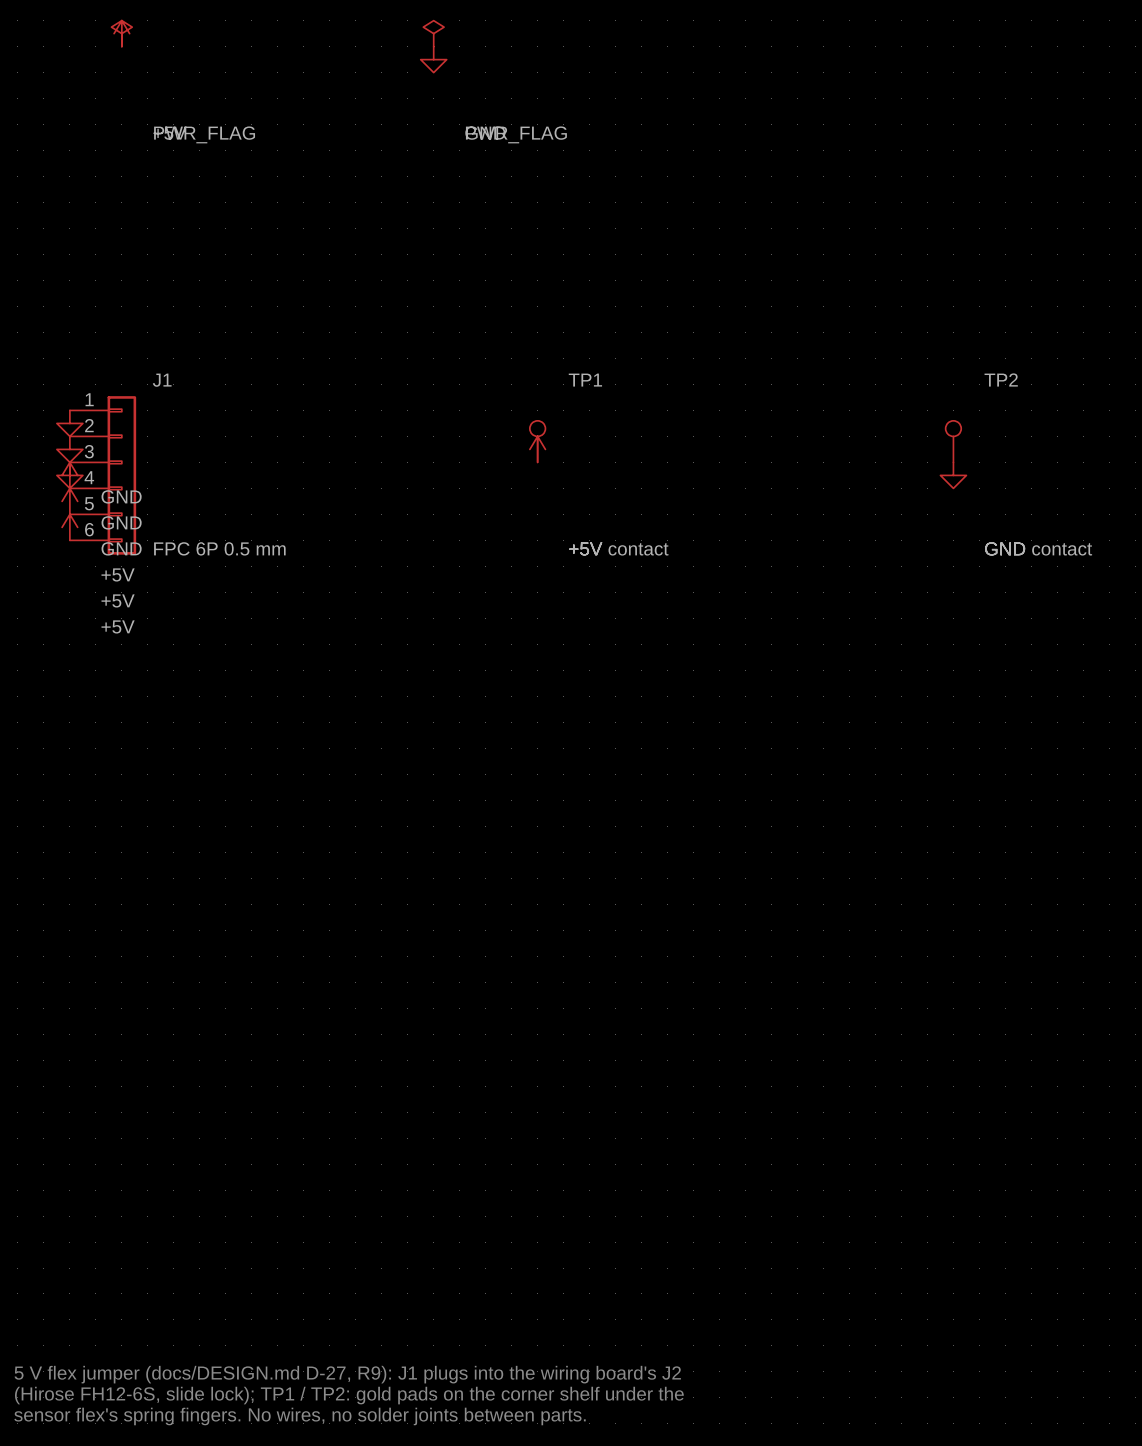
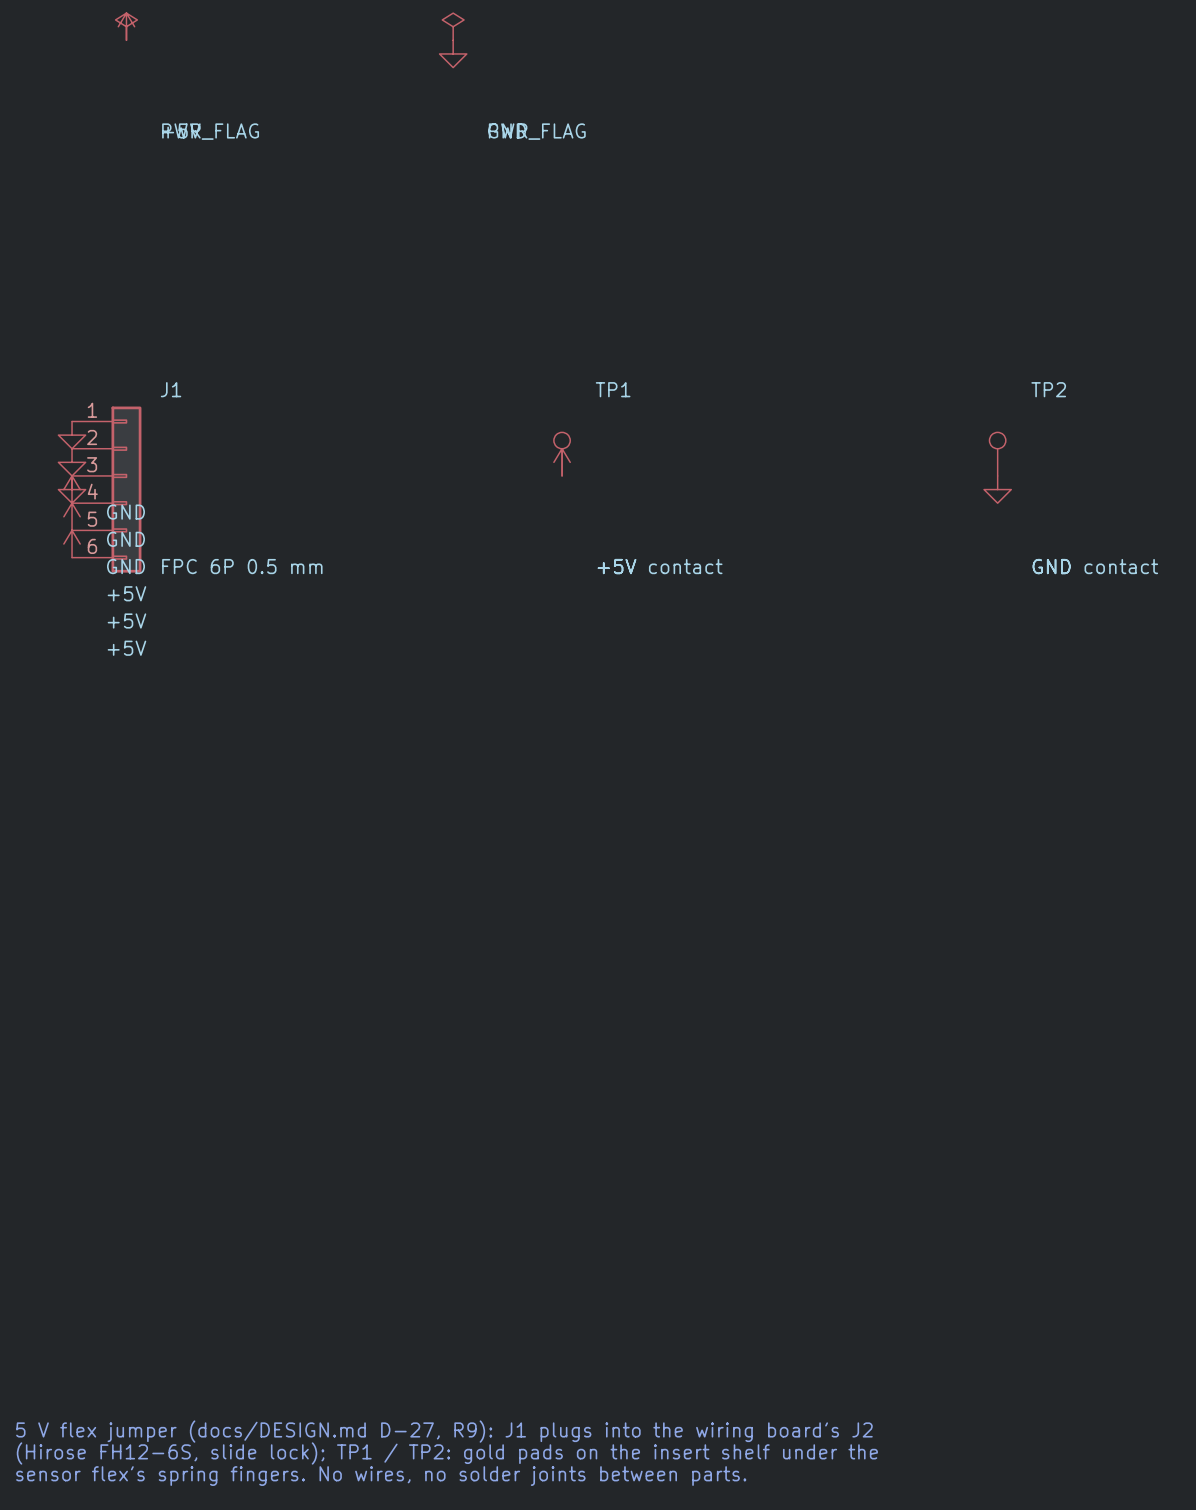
text: (Hirose FH12-6S, slide lock); TP1 / TP2: gold pads on the corner shelf under the (349, 1395) -> (Hirose FH12-6S, slide lock); TP1 / TP2: gold pads on the insert shelf under the (447, 1453)

